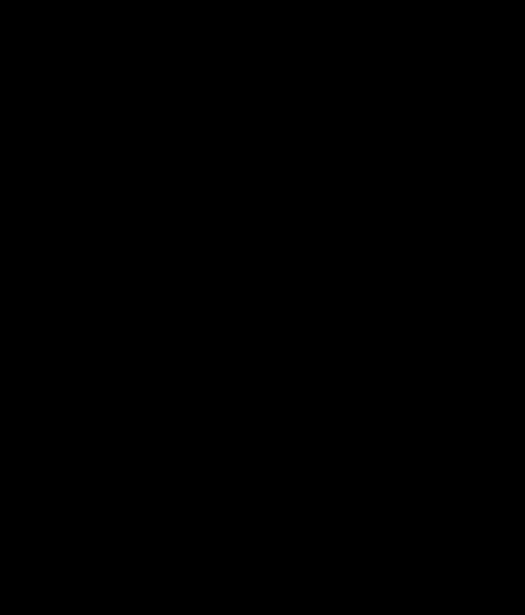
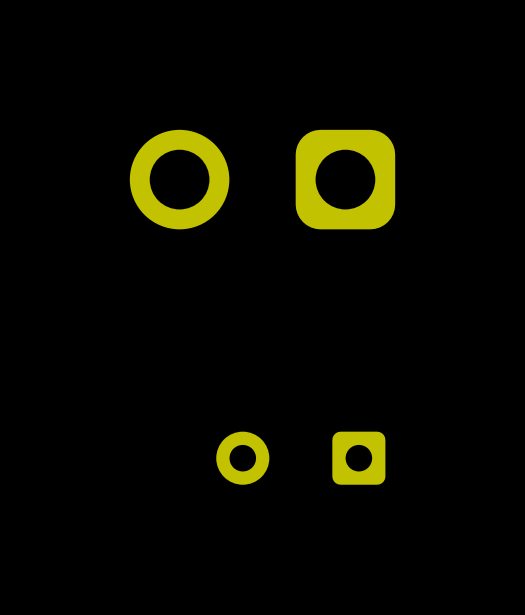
part: none -> (262, 179)
part: none -> (300, 458)

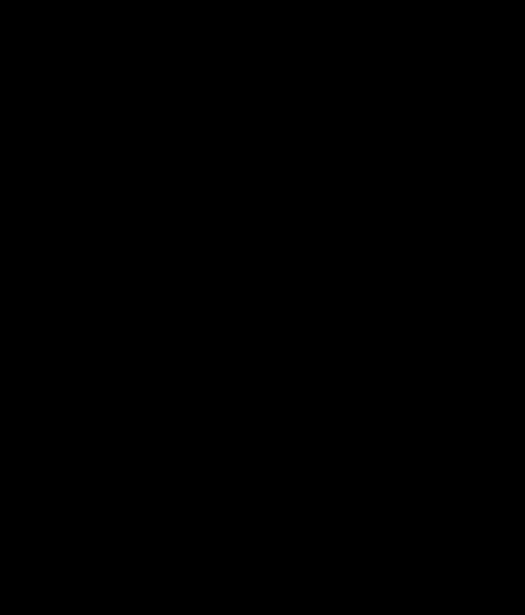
part: (262, 179) -> none
part: (300, 458) -> none

